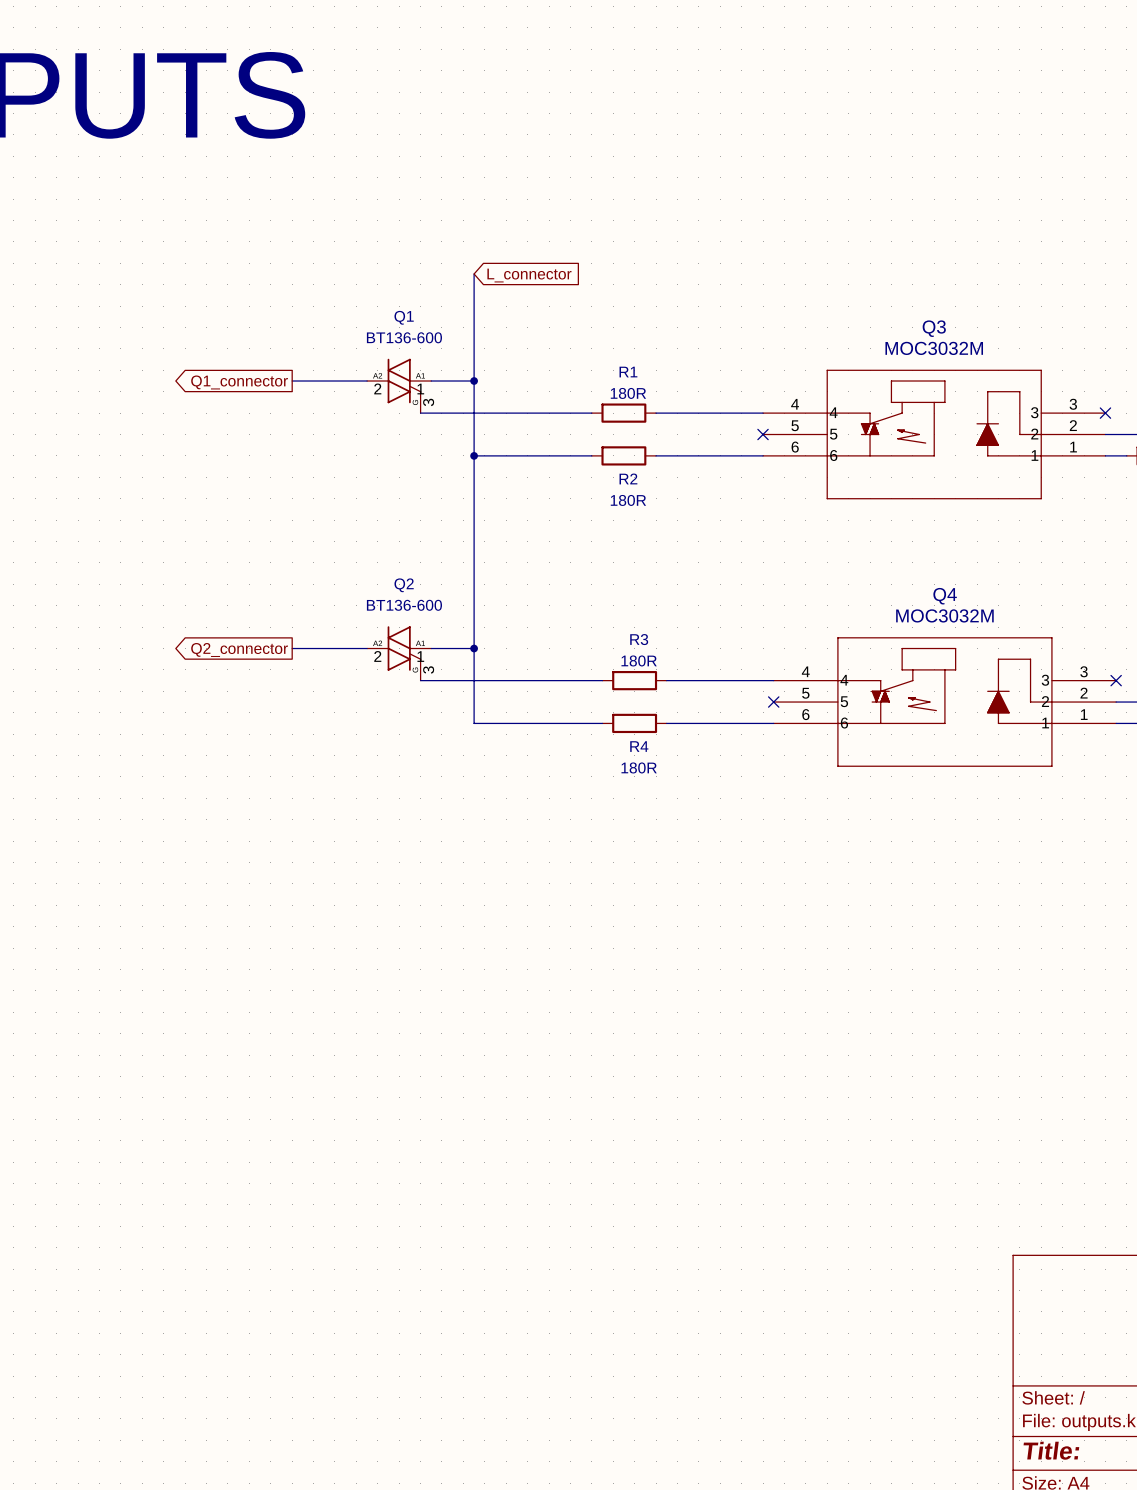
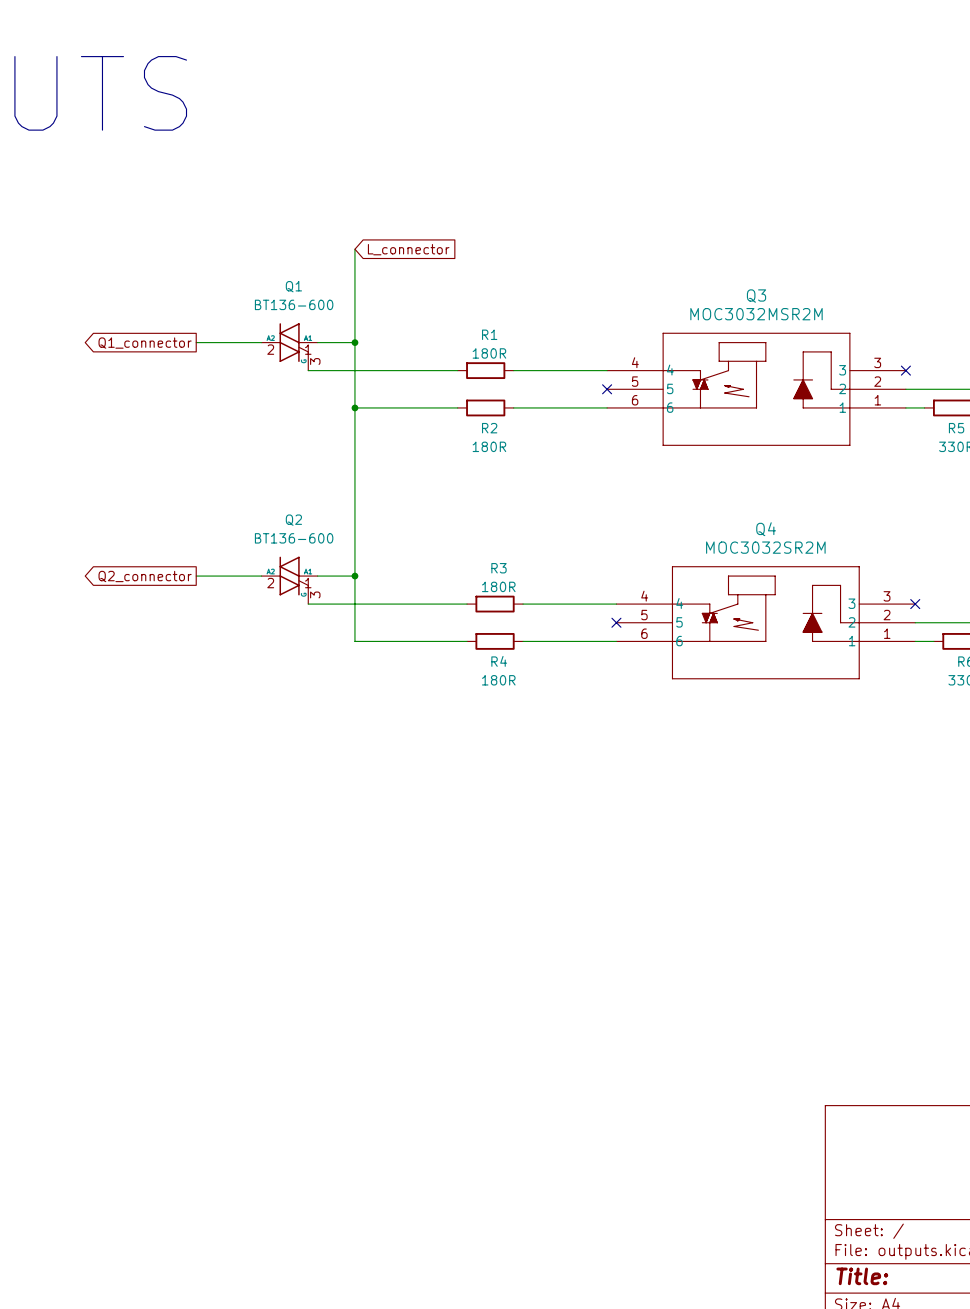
Q3 value: MOC3032M (934, 348) -> MOC3032MSR2M (756, 314)
Q4 value: MOC3032M (944, 615) -> MOC3032SR2M (765, 547)

